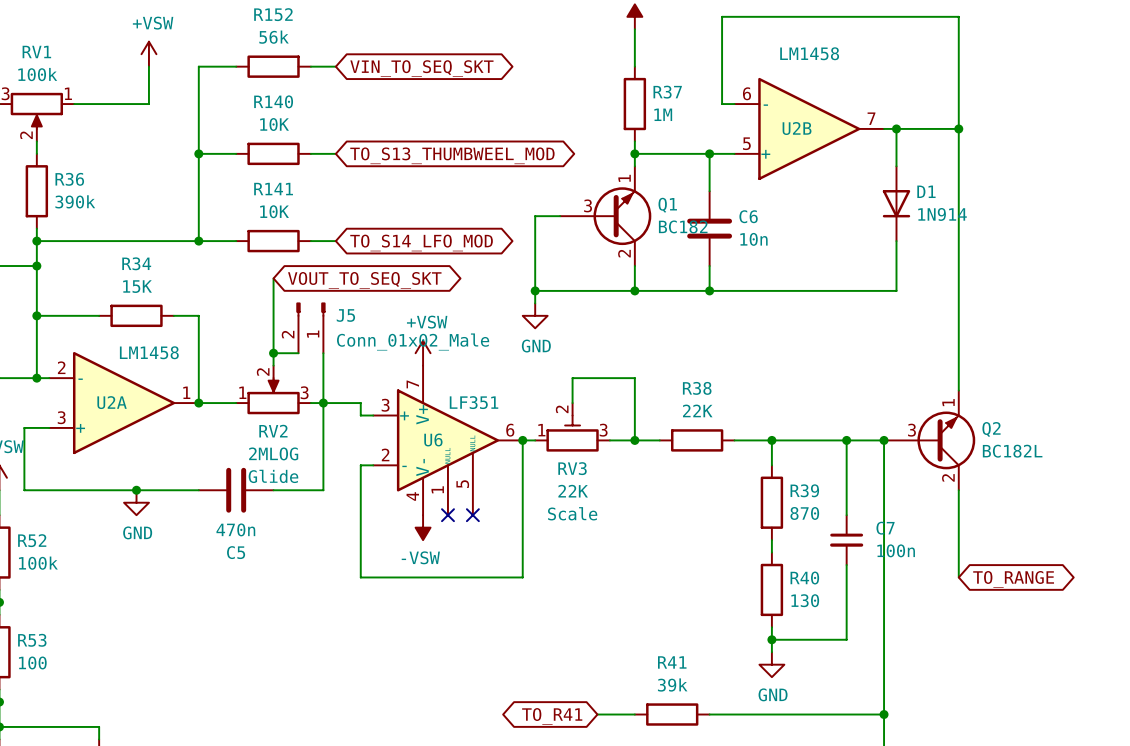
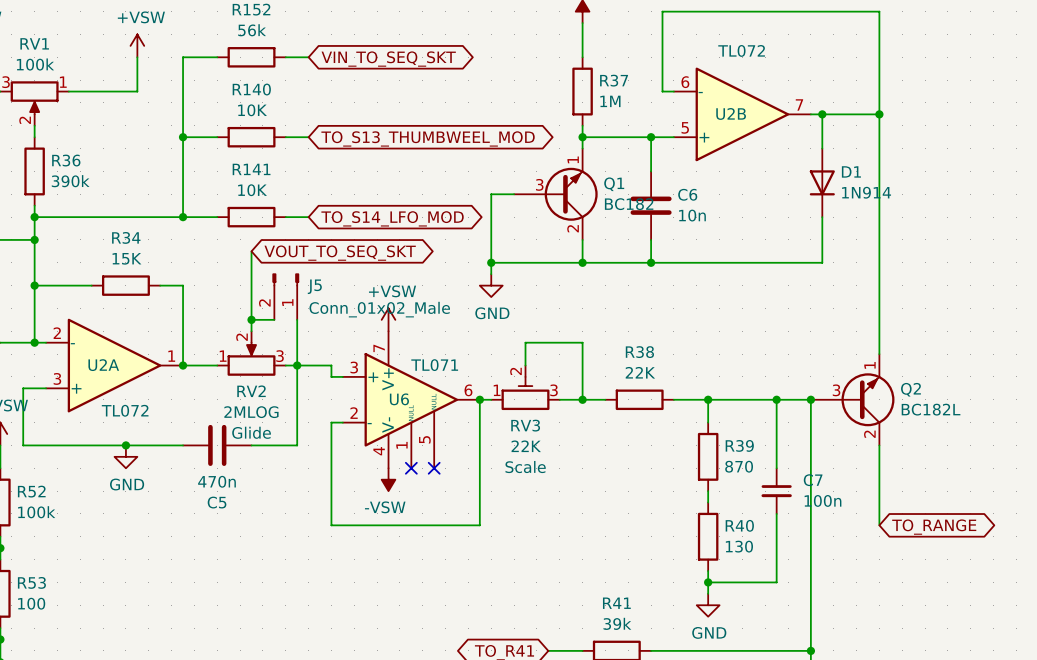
U2B value: LM1458 (809, 53) -> TL072 (741, 50)
U2A value: LM1458 (149, 352) -> TL072 (125, 410)
U6 value: LF351 (474, 402) -> TL071 (434, 365)

